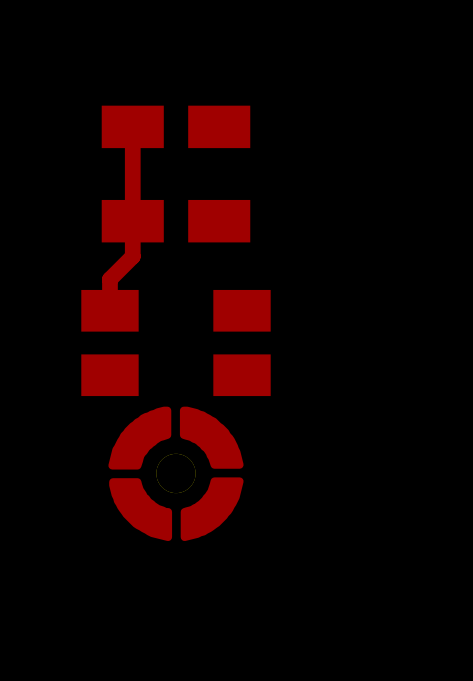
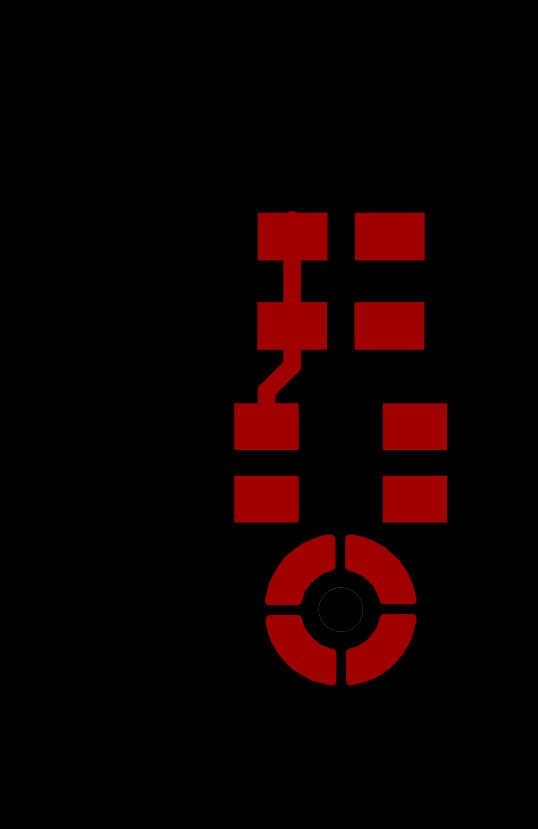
part position: (175, 126) -> (341, 236)

